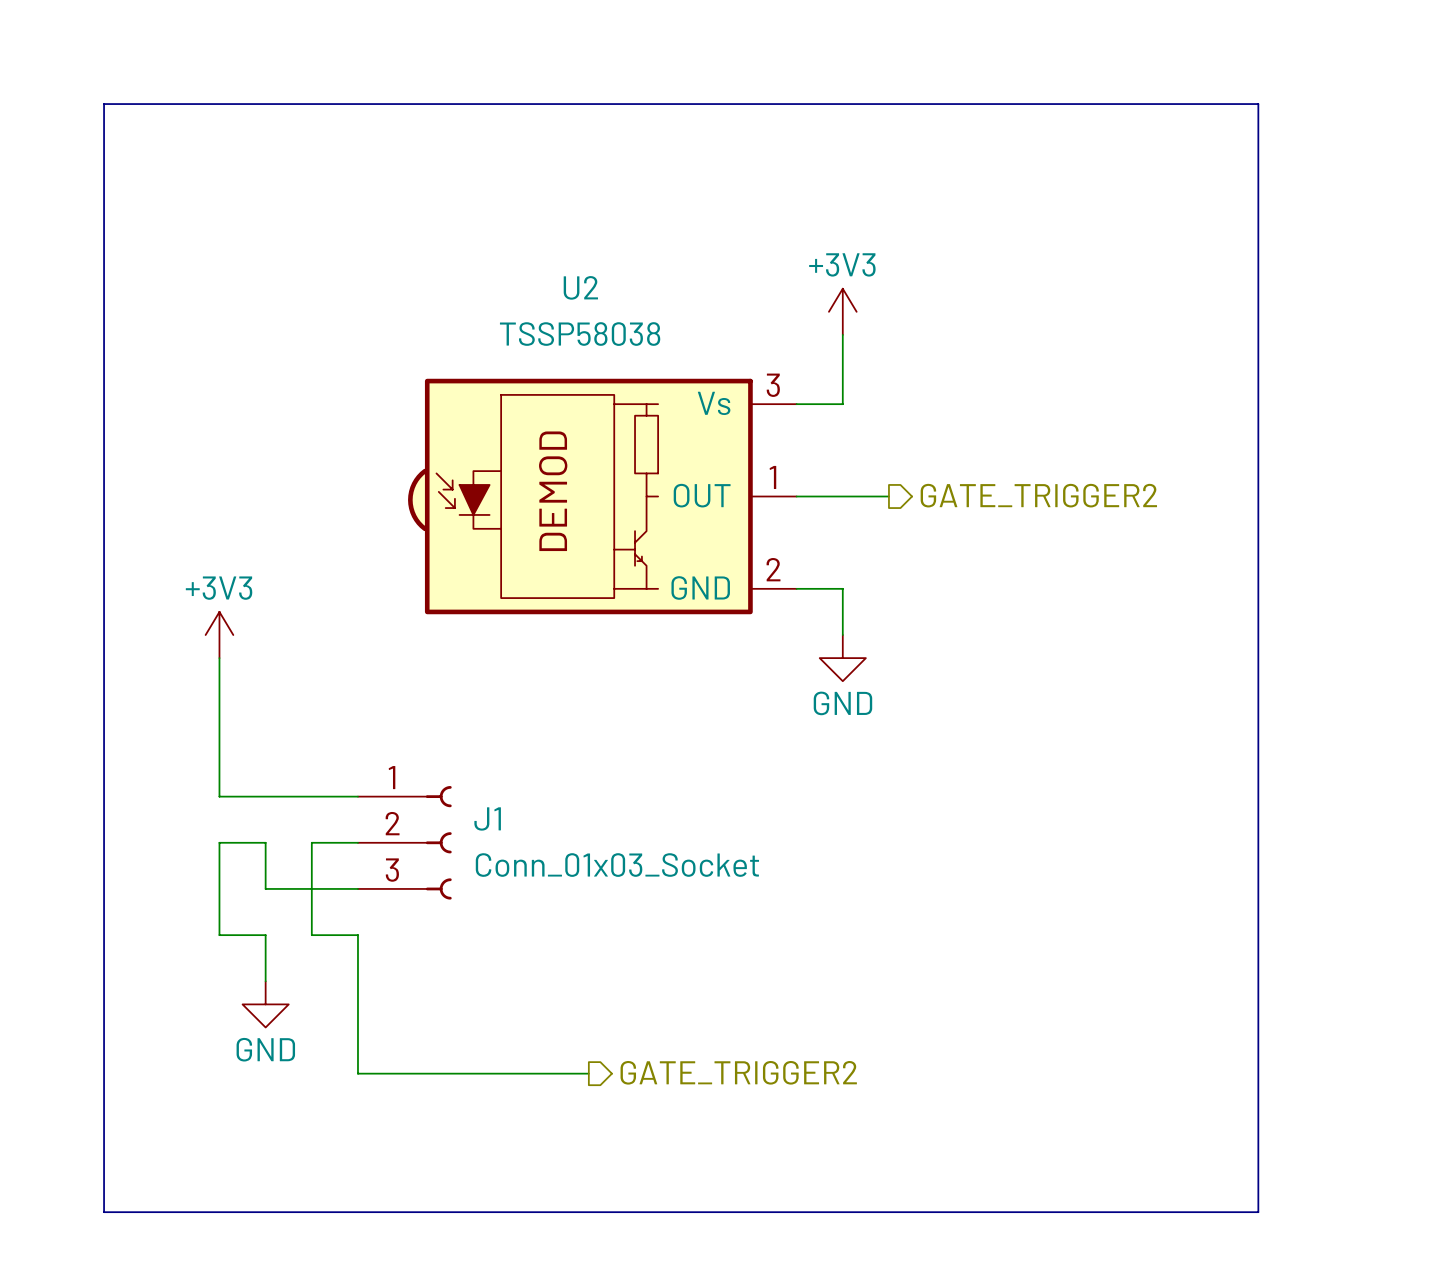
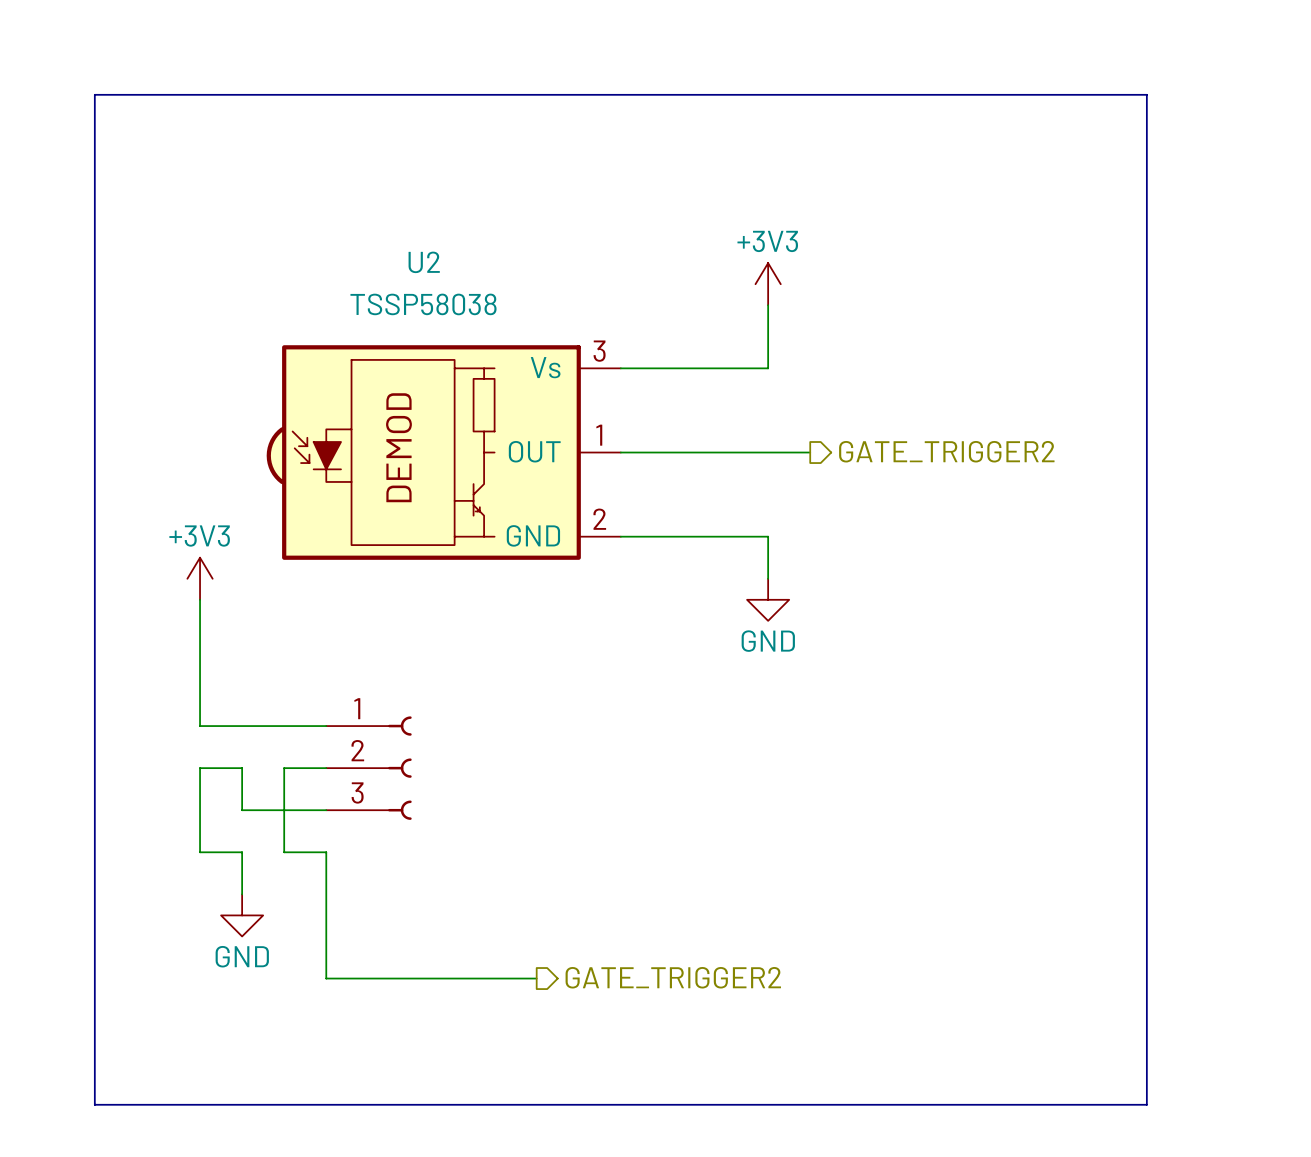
U2 position: (602, 496) -> (443, 452)
J1 name: J1 (487, 818) -> none
J1 value: Conn_01x03_Socket (617, 865) -> none

